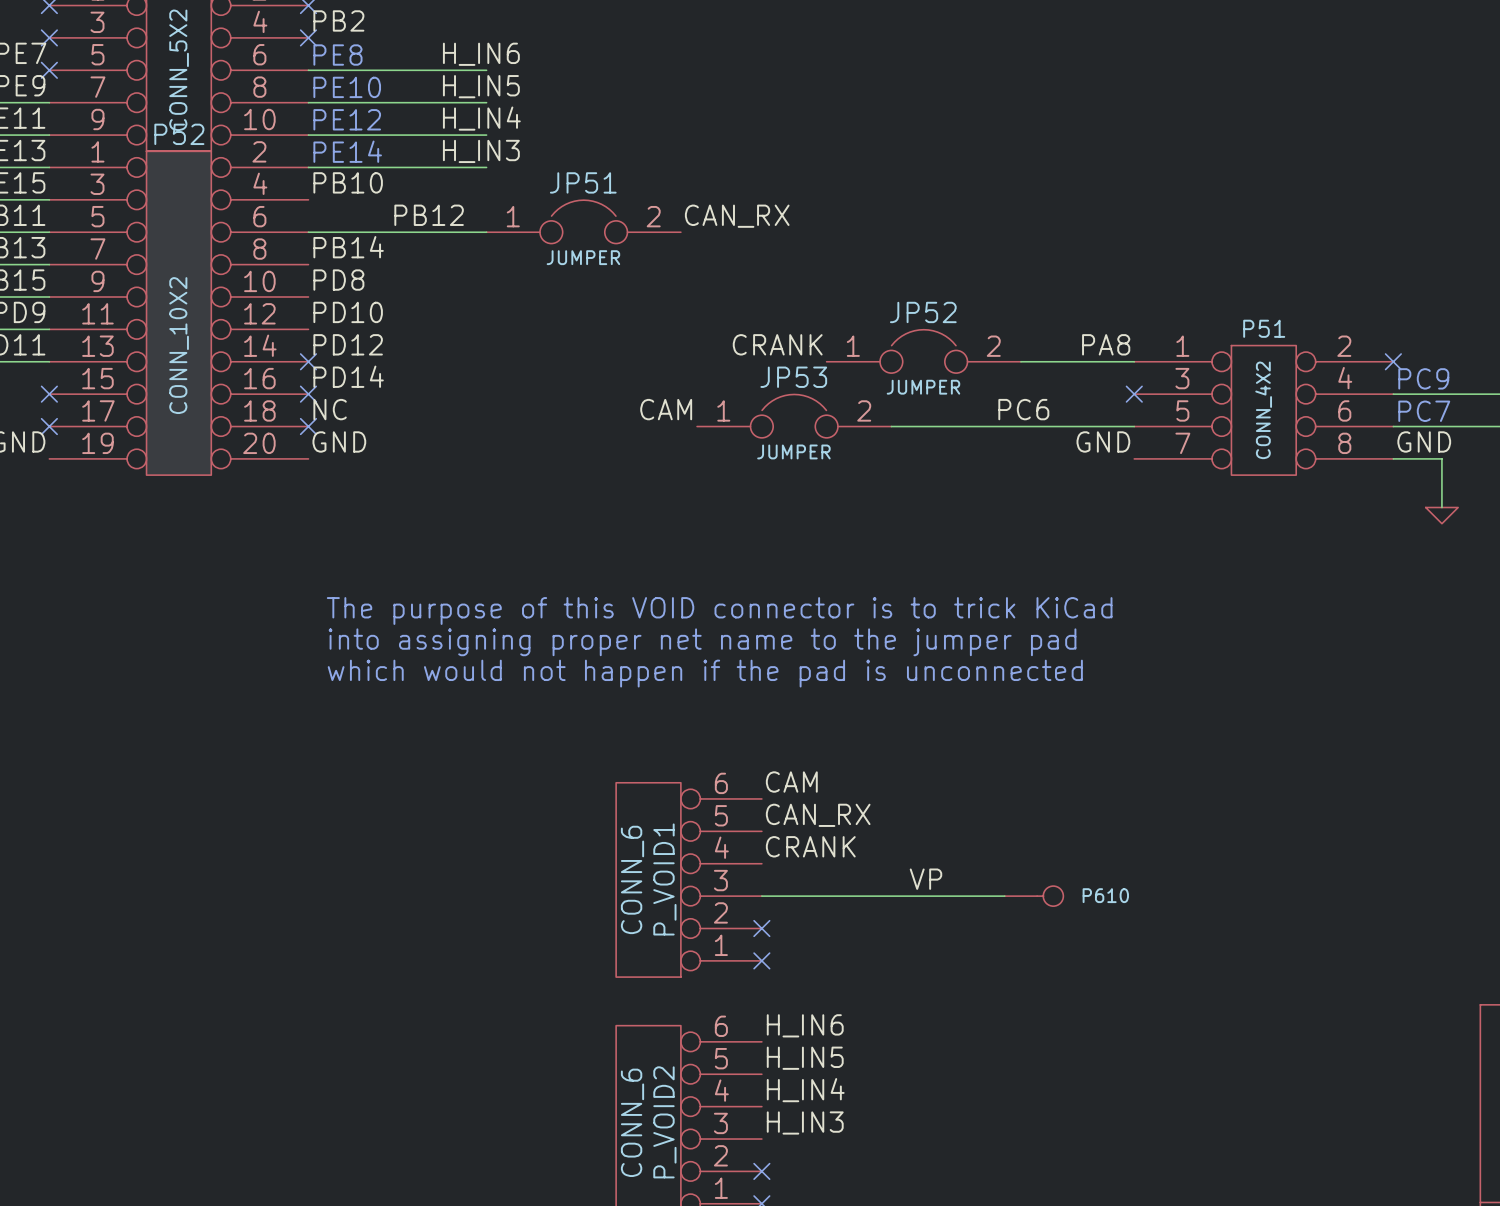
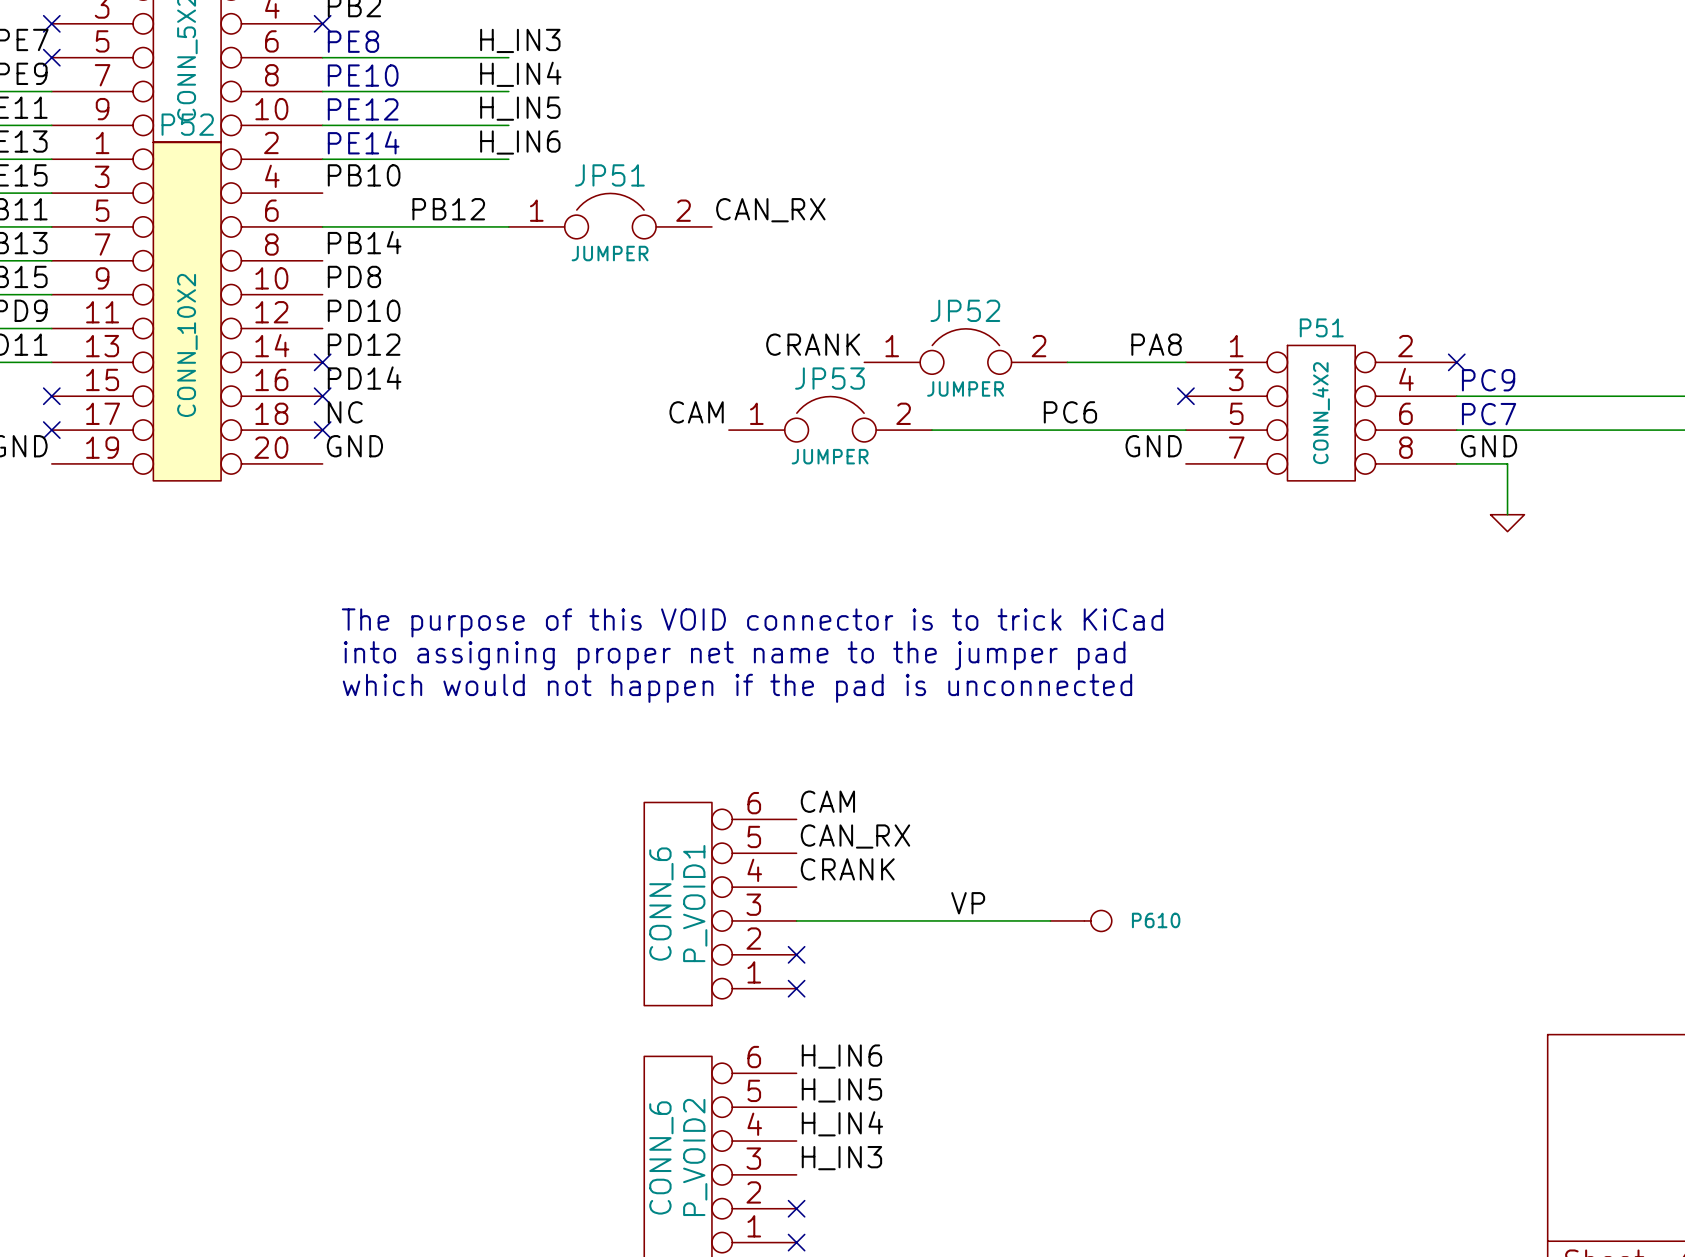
label position: H_IN6 (481, 54) -> H_IN6 (520, 142)
label position: H_IN5 (481, 86) -> H_IN5 (520, 108)
label position: H_IN4 (481, 118) -> H_IN4 (520, 74)
label position: H_IN3 (481, 151) -> H_IN3 (520, 40)

